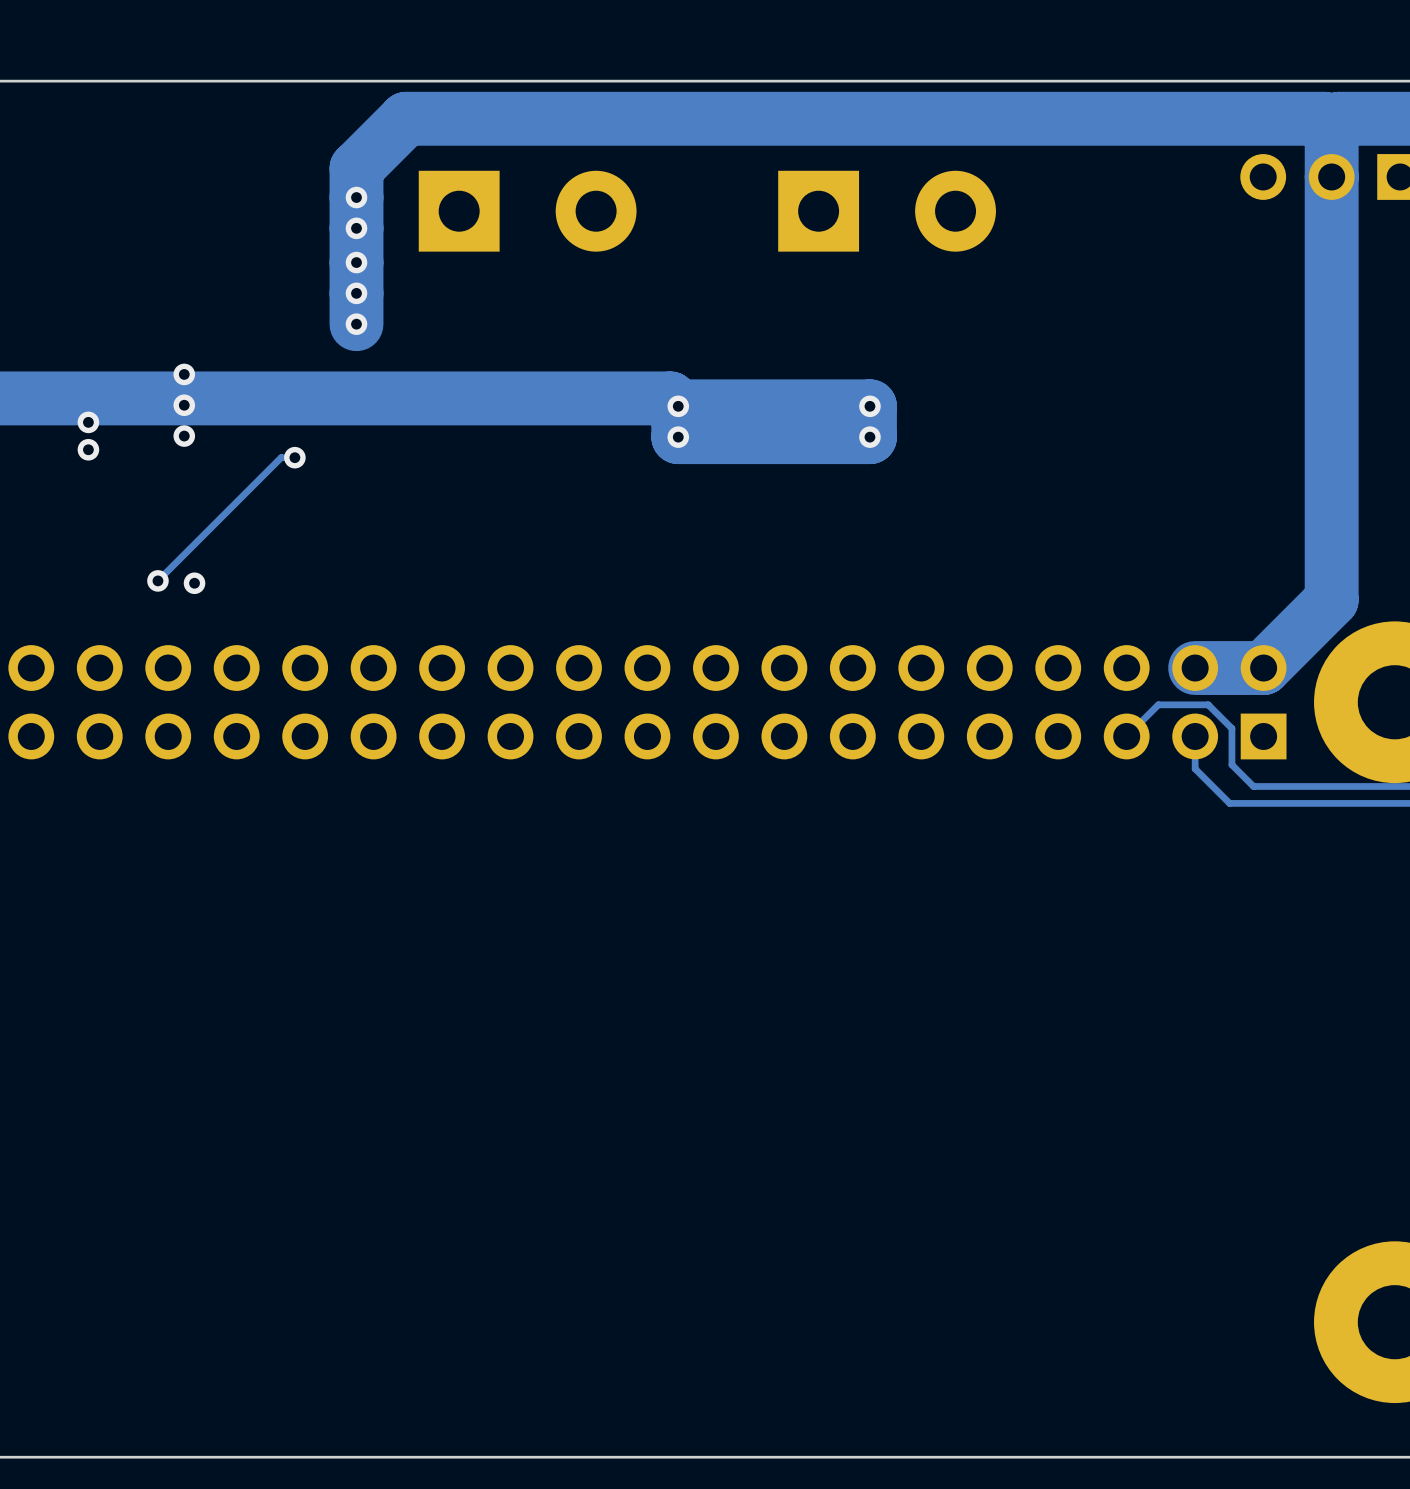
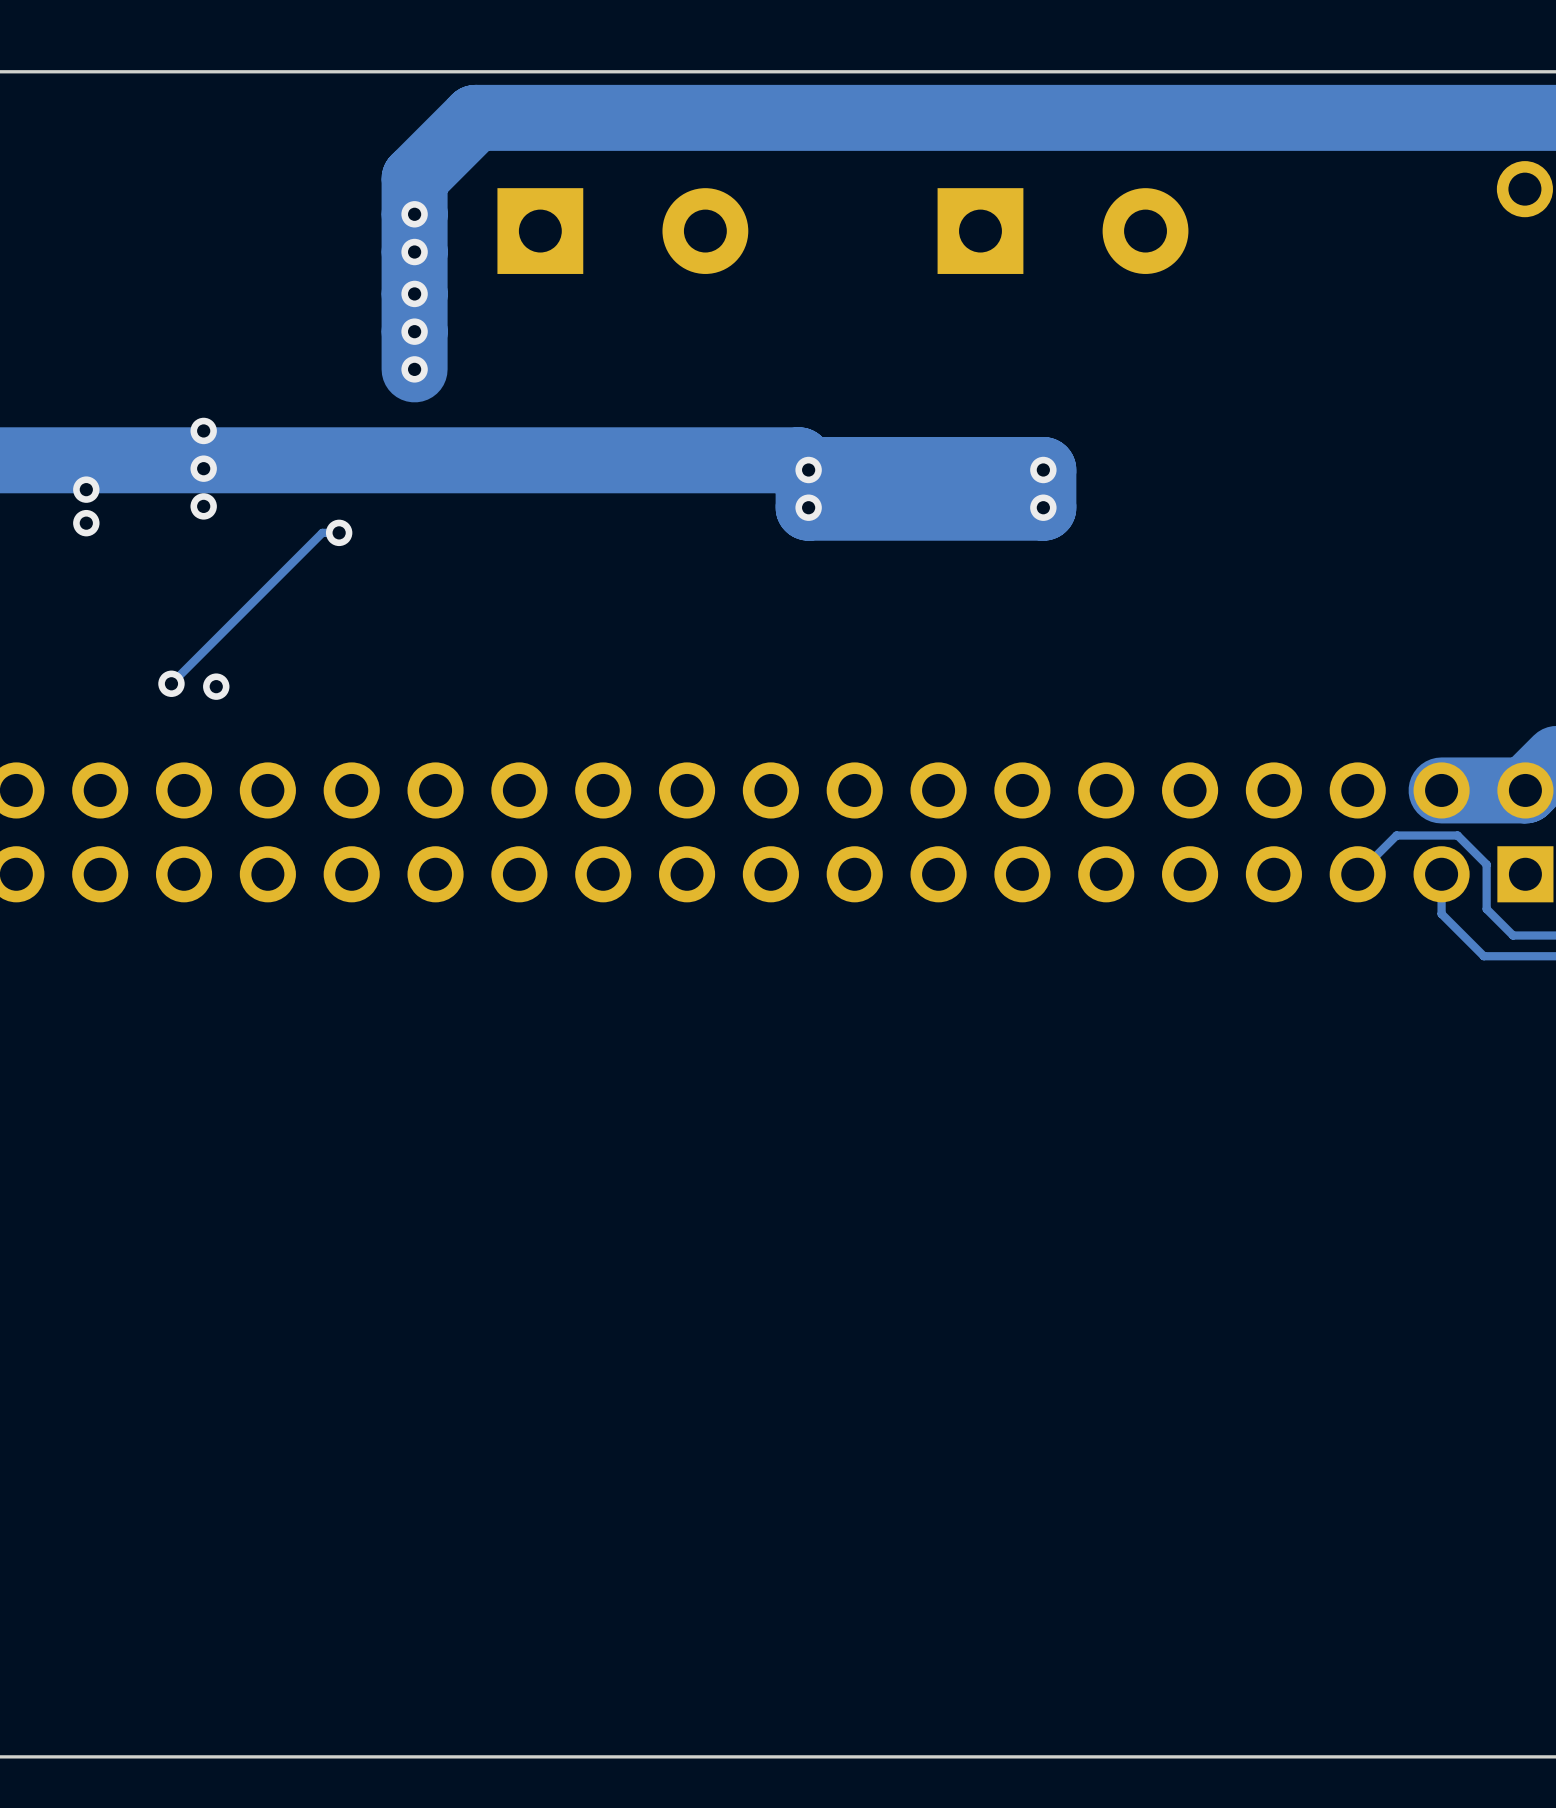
part footprint: [418, 170, 637, 252] -> [497, 188, 749, 274]
part footprint: [778, 170, 996, 252] -> [937, 188, 1189, 274]

